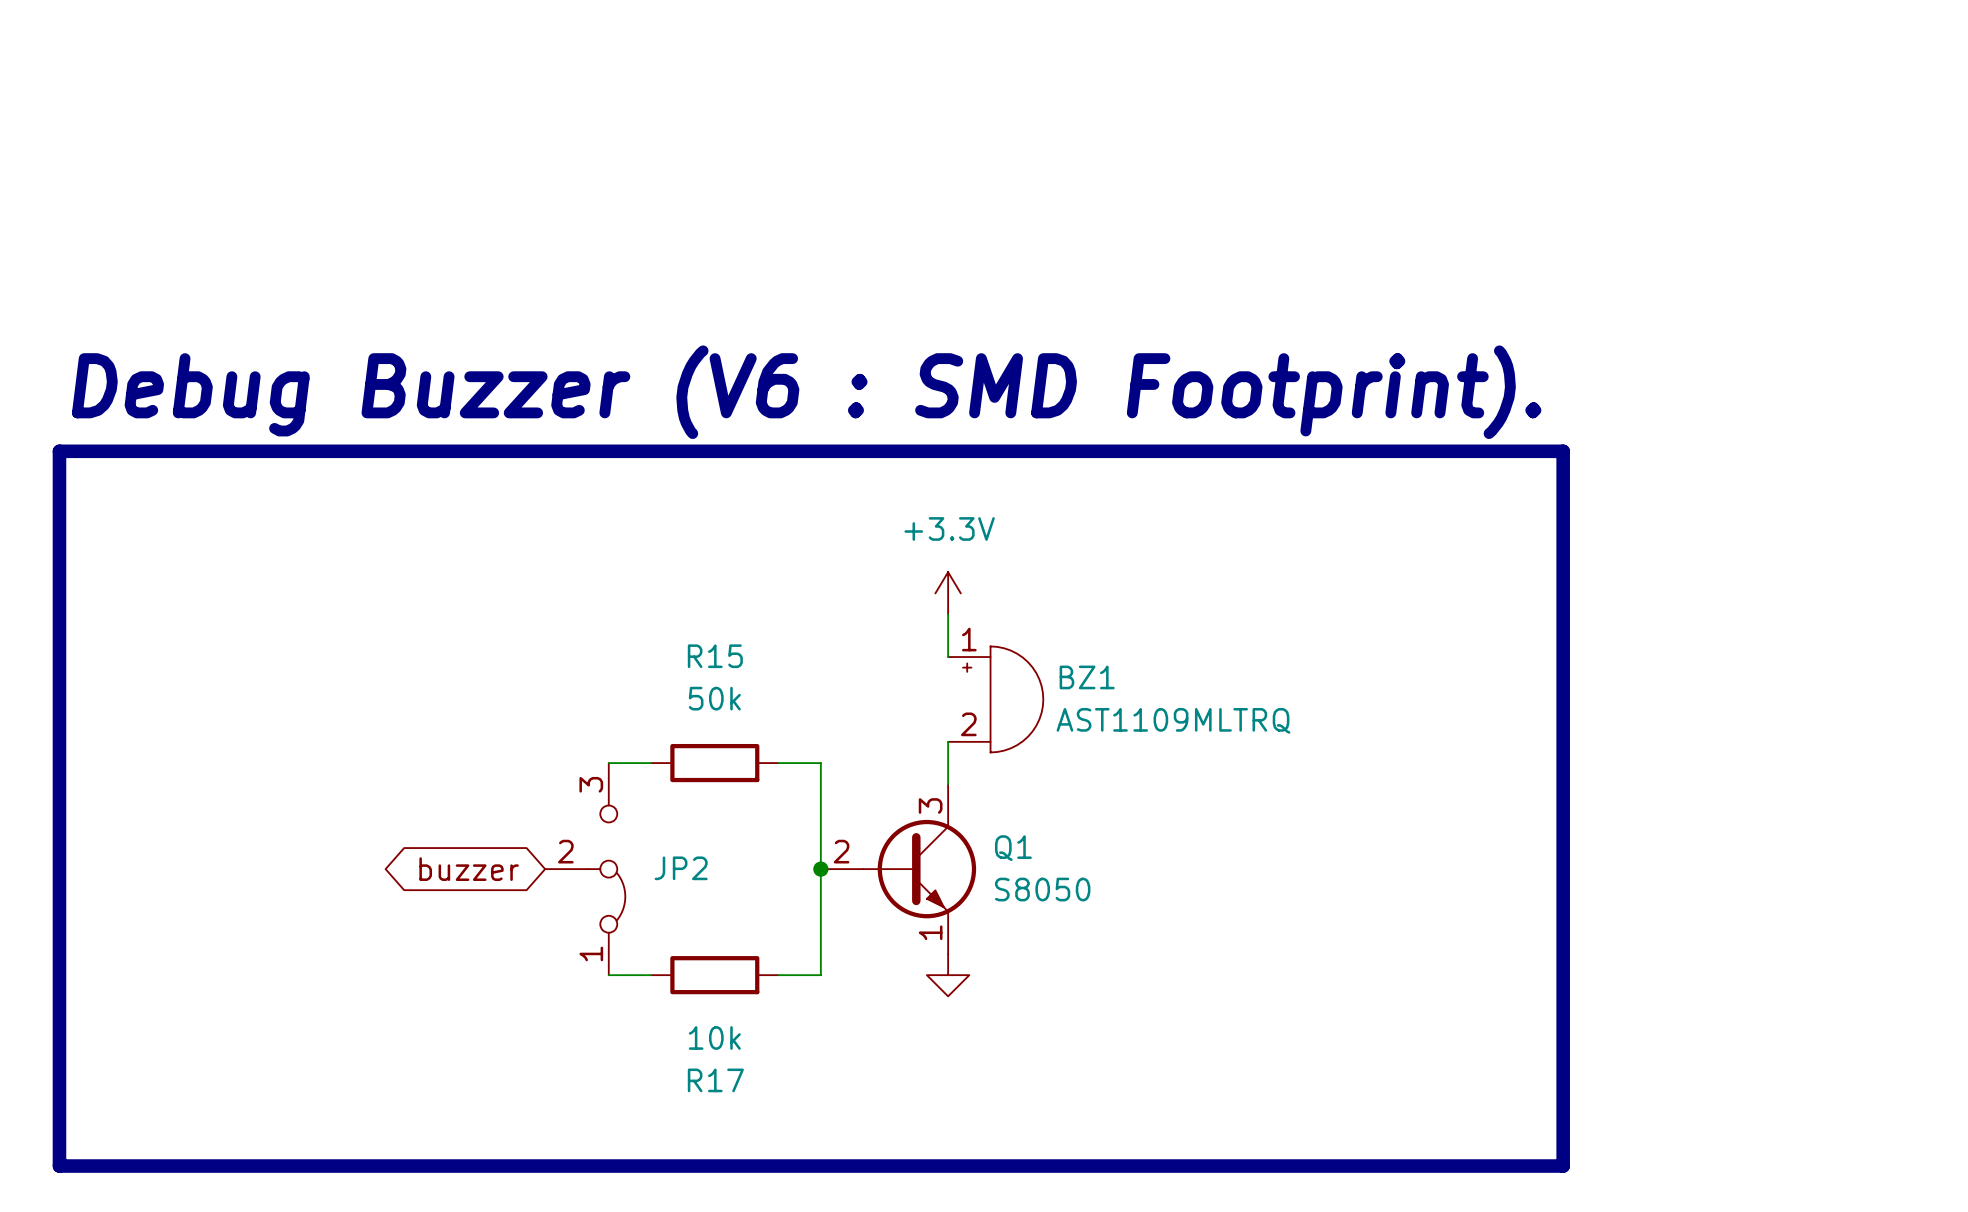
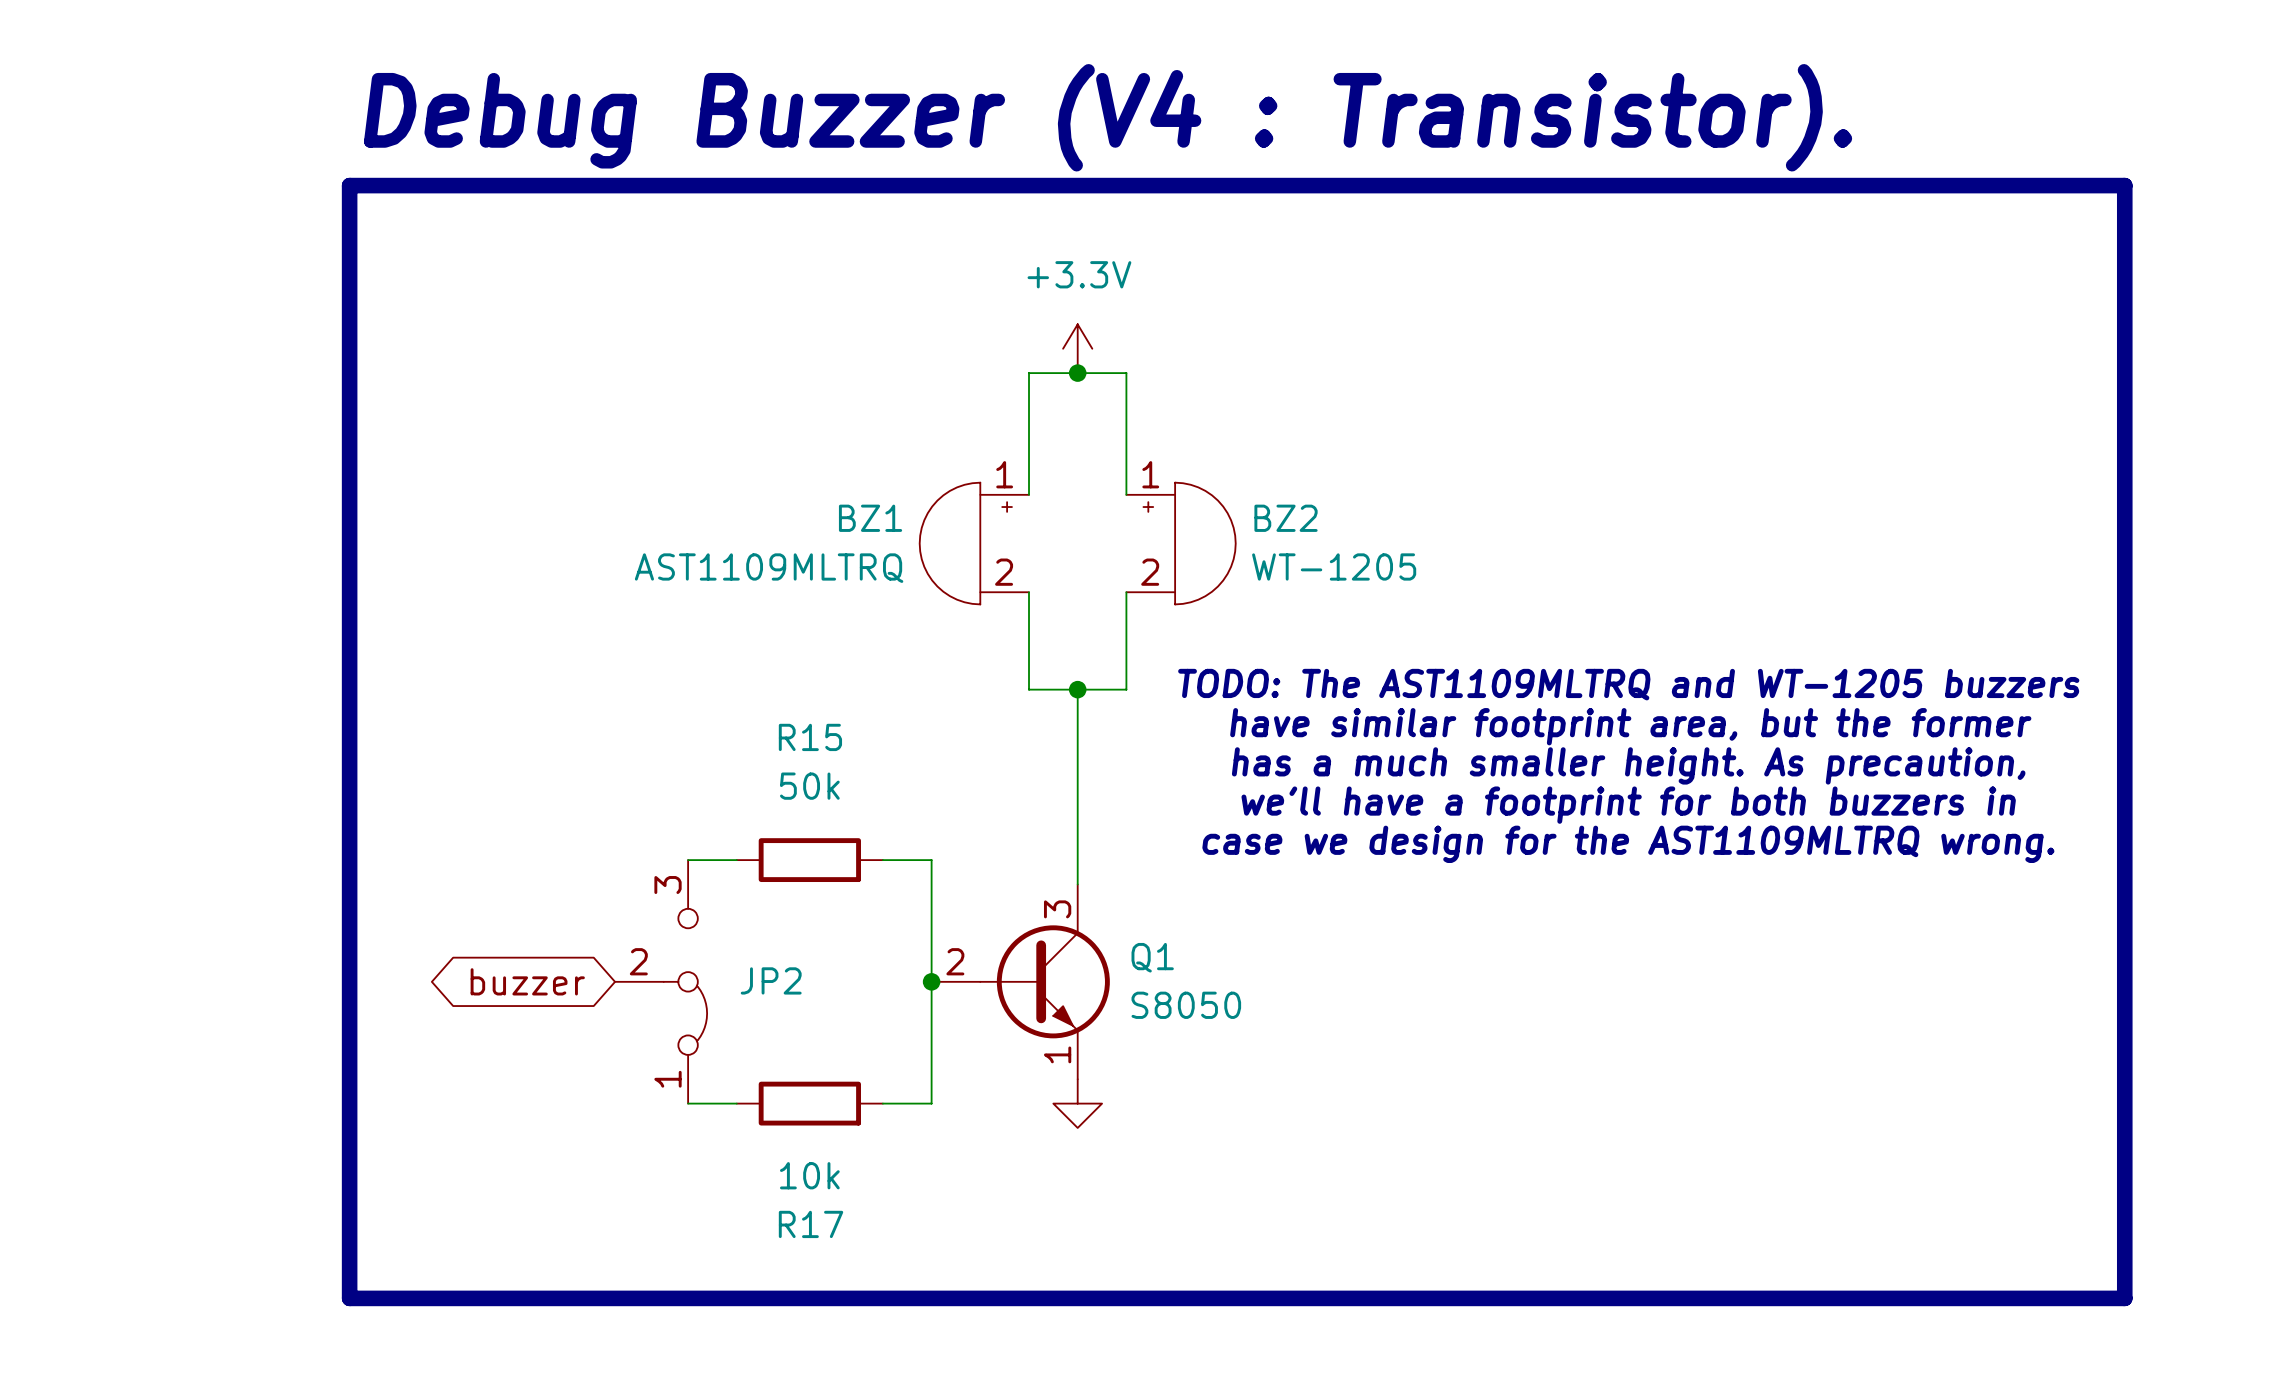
text: none -> Debug Buzzer (V4 : Transistor). (1108, 117)
junction: none -> (1077, 373)
text: Debug Buzzer (V6 : SMD Footprint). (806, 392) -> none
wire: none -> (1029, 494) (1029, 373) (1126, 373) (1126, 494)
line: (59, 451) (1563, 451) (1563, 1166) (59, 1166) (59, 451) -> (349, 185) (349, 1298) (2124, 1298) (2124, 185) (349, 185)
BZ2: none -> WT-1205 (1181, 543)
wire: none -> (1029, 592) (1029, 689) (1126, 689) (1126, 592)
power symbol position: +3.3V (948, 593) -> +3.3V (1077, 348)
text: none -> TODO: The AST1109MLTRQ and WT-1205 buzzers (1628, 684)
junction: none -> (1077, 689)
text: none -> have similar footprint area, but the former (1630, 726)
wire: none -> (1077, 738) (1077, 835)
text: none -> has a much smaller height. As precaution, (1628, 765)
BZ1 position: (995, 699) -> (974, 543)
BZ1 flip: as is (1003, 699) -> left-right (965, 543)
text: none -> we'll have a footprint for both buzzers in (1628, 805)
text: none -> case we design for the AST1109MLTRQ wrong. (1628, 844)

